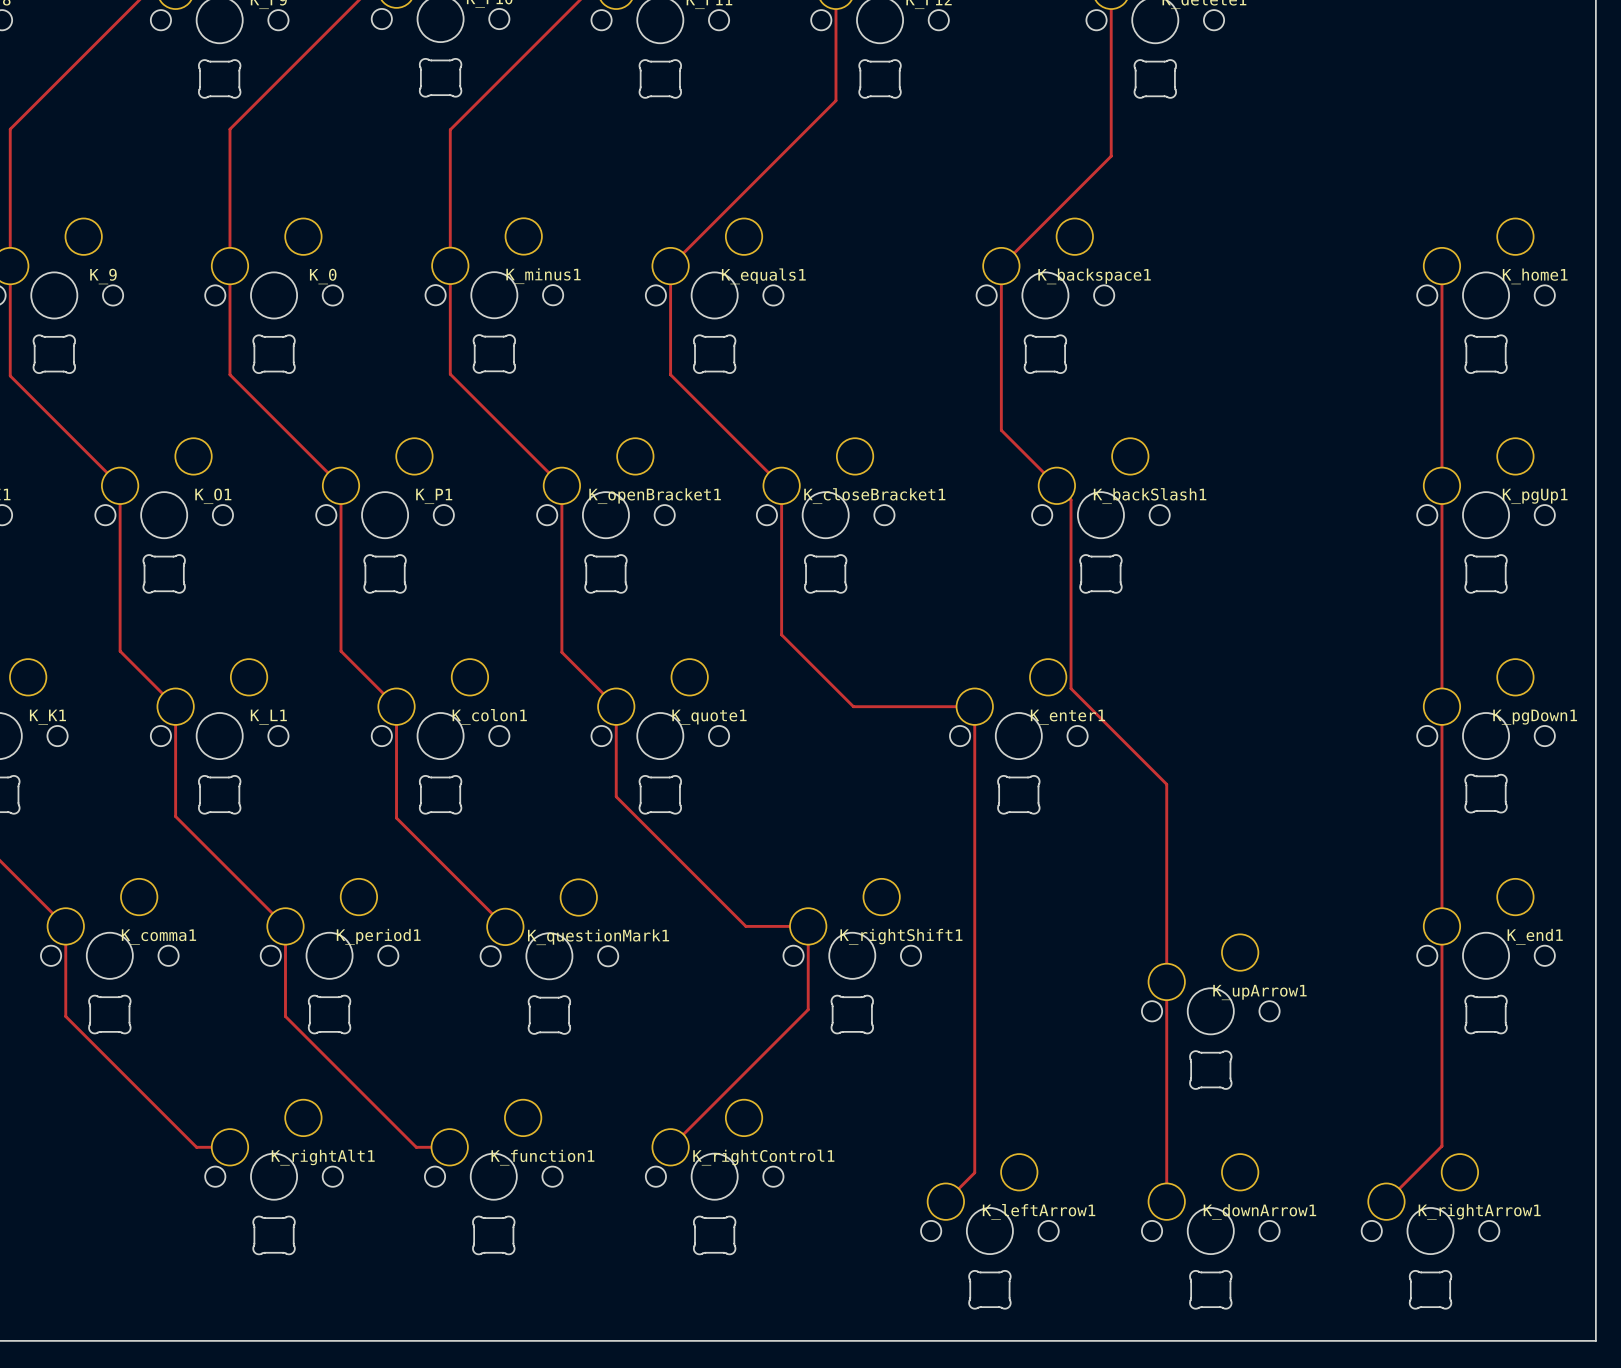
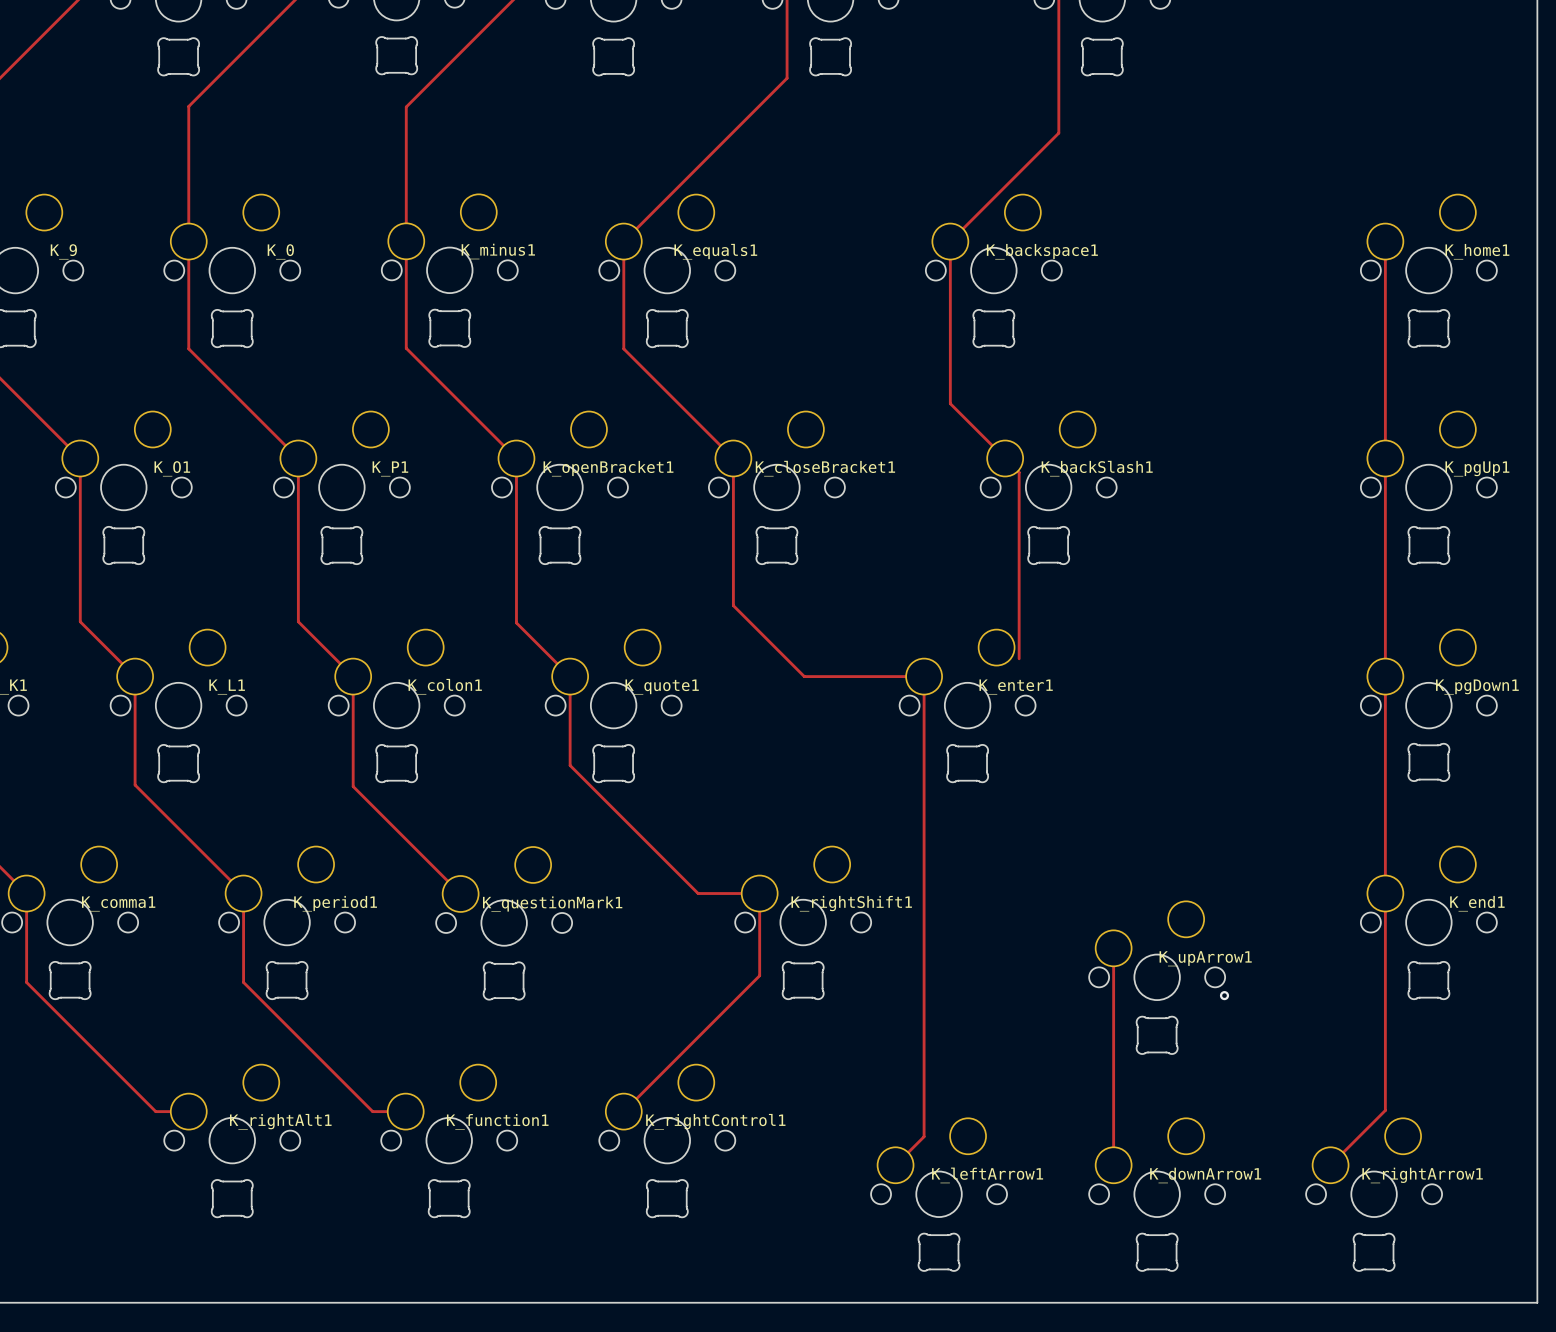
track: (1071, 688) (1166, 784) (1166, 981) -> none
via: none -> (1224, 995)

